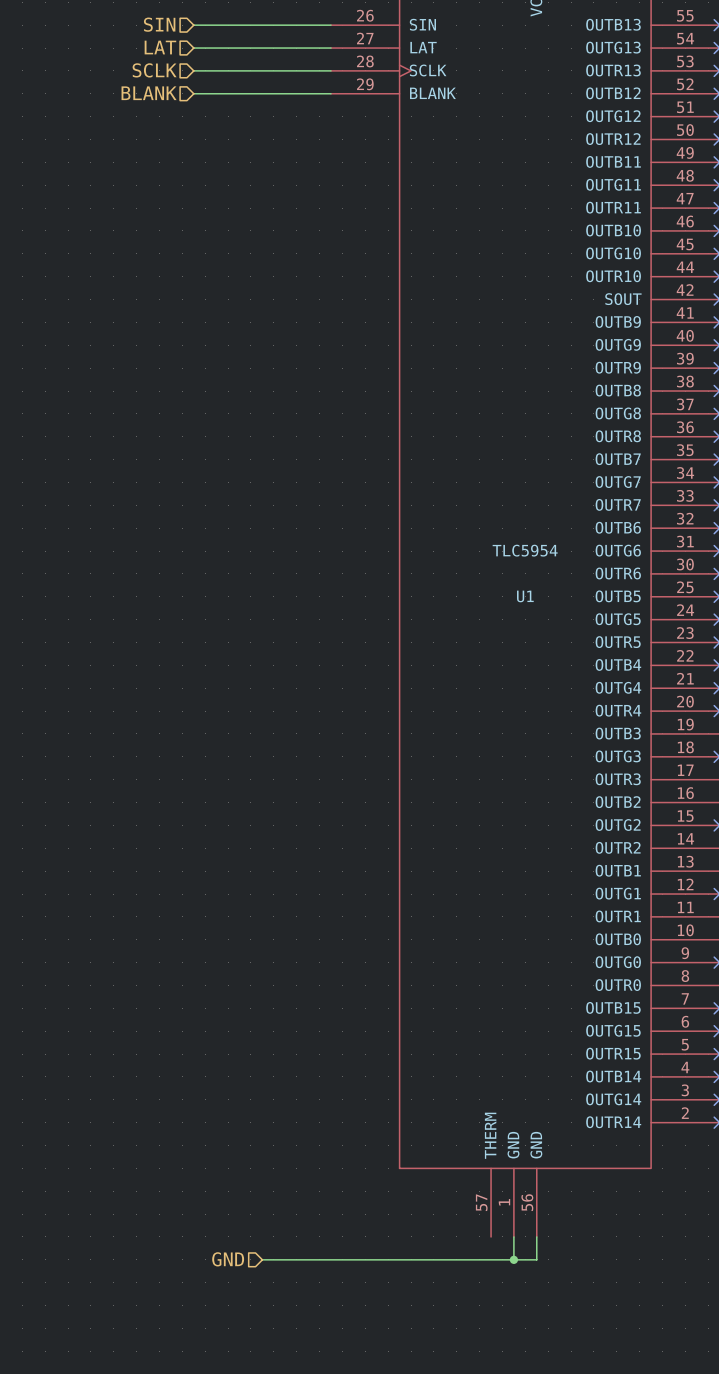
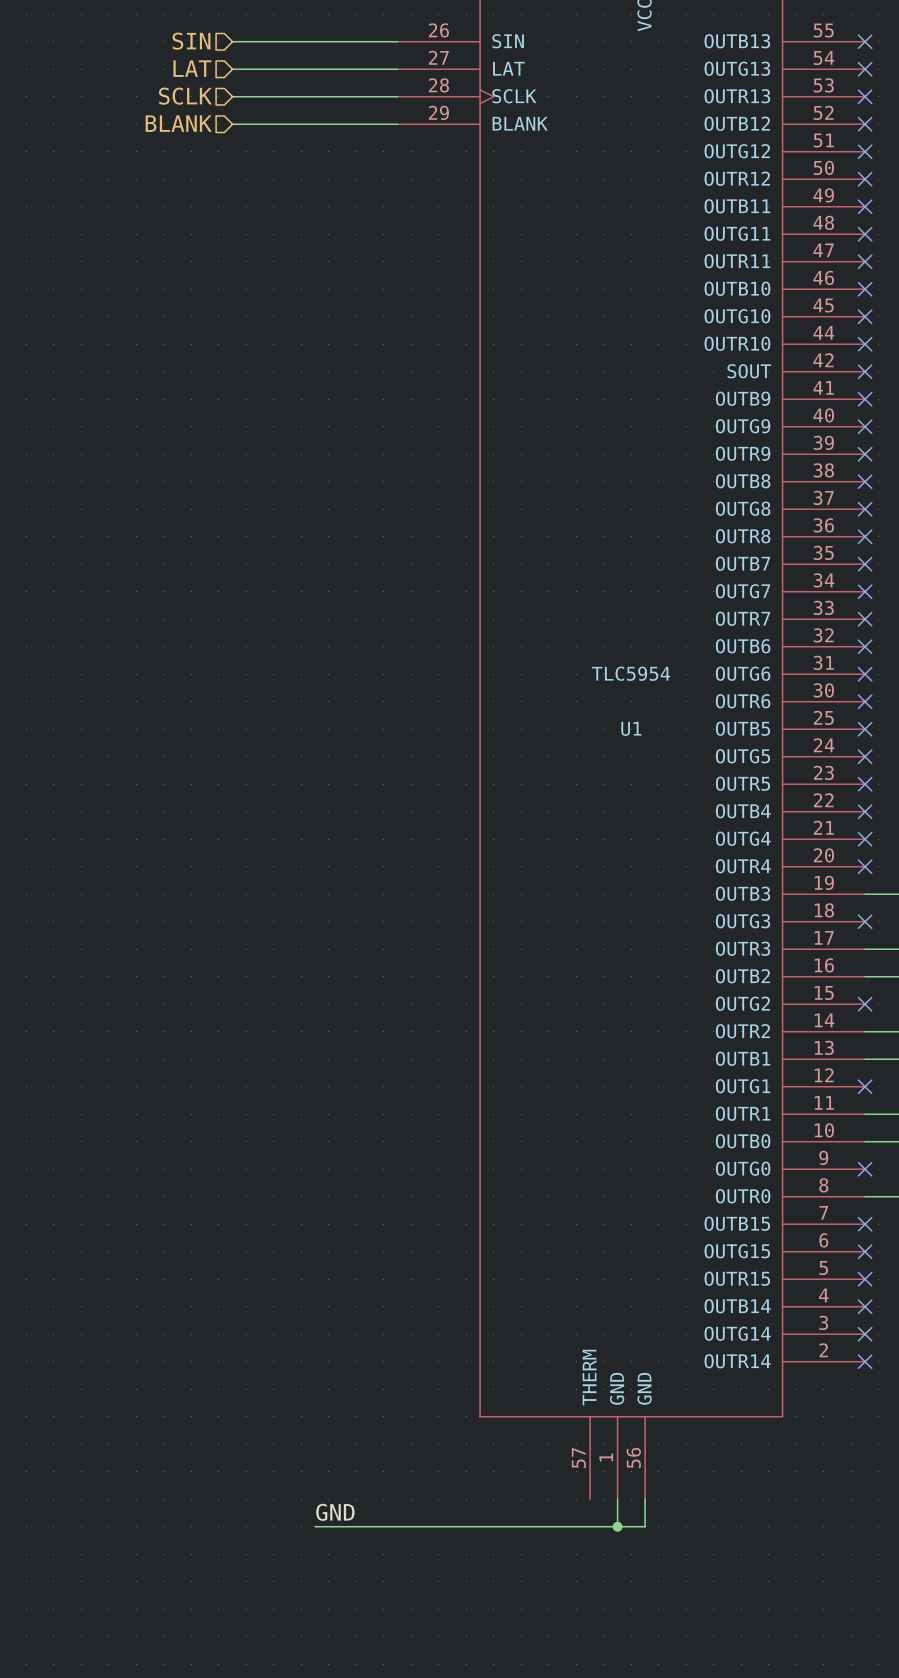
label: none -> GND (335, 1512)
hierarchical label: GND (228, 1259) -> none

